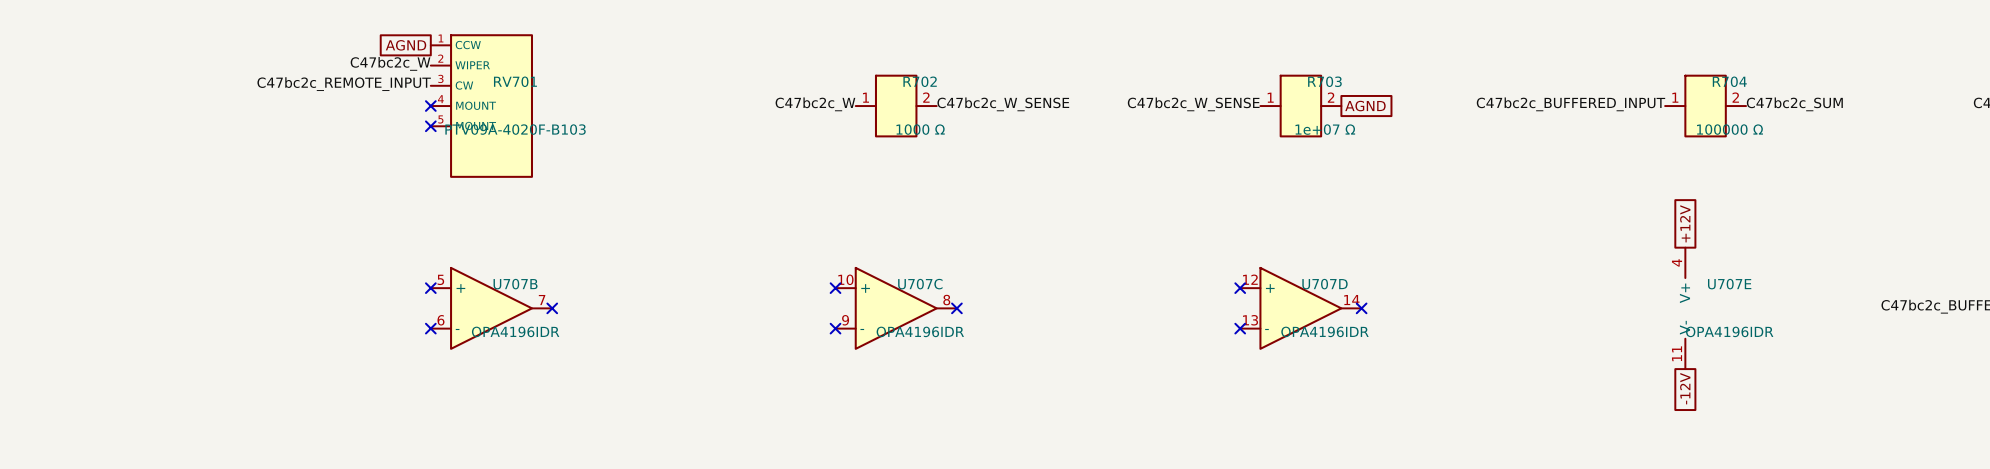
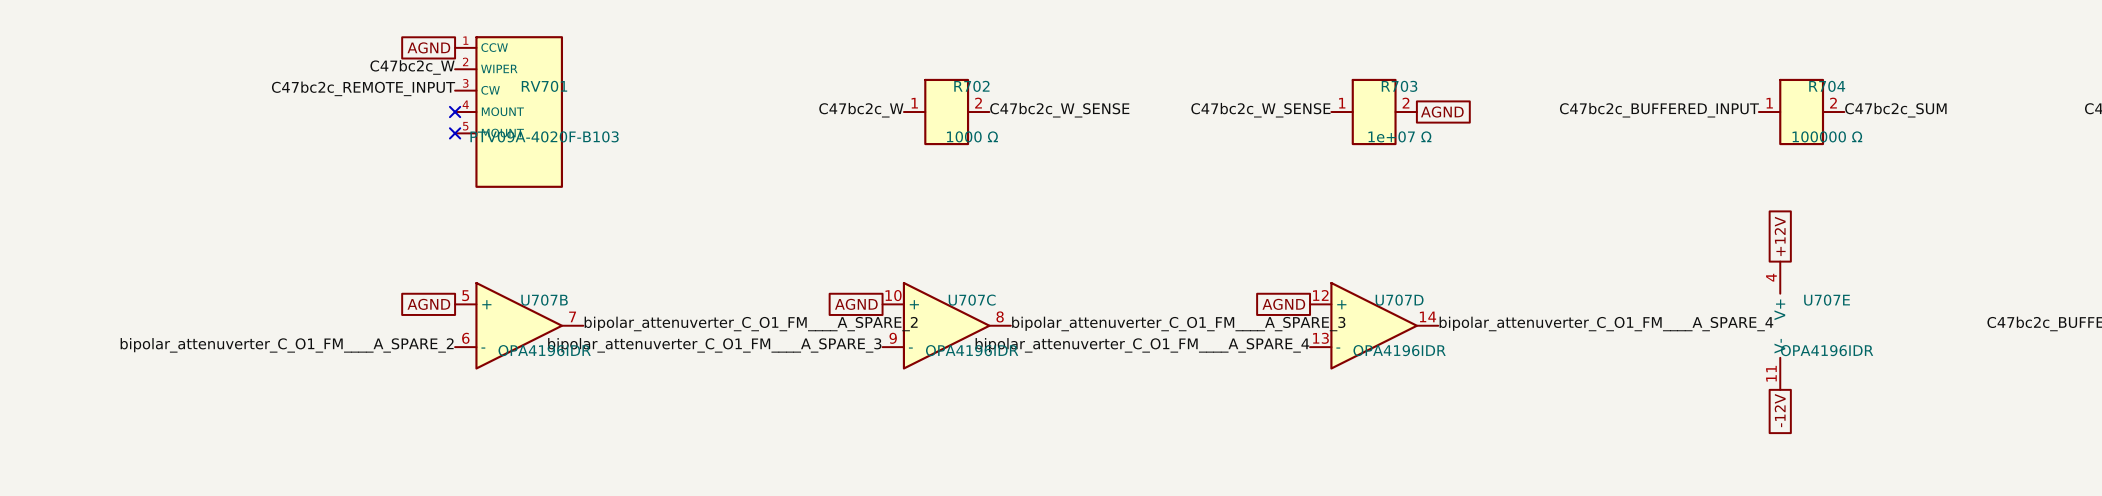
global label: none -> AGND (428, 304)
no-connect mark: (430, 288) -> none
global label: none -> AGND (856, 304)
no-connect mark: (835, 288) -> none
global label: none -> AGND (1283, 304)
no-connect mark: (1240, 288) -> none
label: none -> bipolar_attenuverter_C_O1_FM____A_SPARE_2 (751, 323)
label: none -> bipolar_attenuverter_C_O1_FM____A_SPARE_3 (1178, 323)
label: none -> bipolar_attenuverter_C_O1_FM____A_SPARE_4 (1606, 323)
no-connect mark: (552, 308) -> none
no-connect mark: (956, 308) -> none
no-connect mark: (1361, 308) -> none
label: none -> bipolar_attenuverter_C_O1_FM____A_SPARE_2 (287, 345)
label: none -> bipolar_attenuverter_C_O1_FM____A_SPARE_3 (714, 345)
label: none -> bipolar_attenuverter_C_O1_FM____A_SPARE_4 (1142, 345)
no-connect mark: (430, 328) -> none
no-connect mark: (835, 328) -> none
no-connect mark: (1240, 328) -> none

